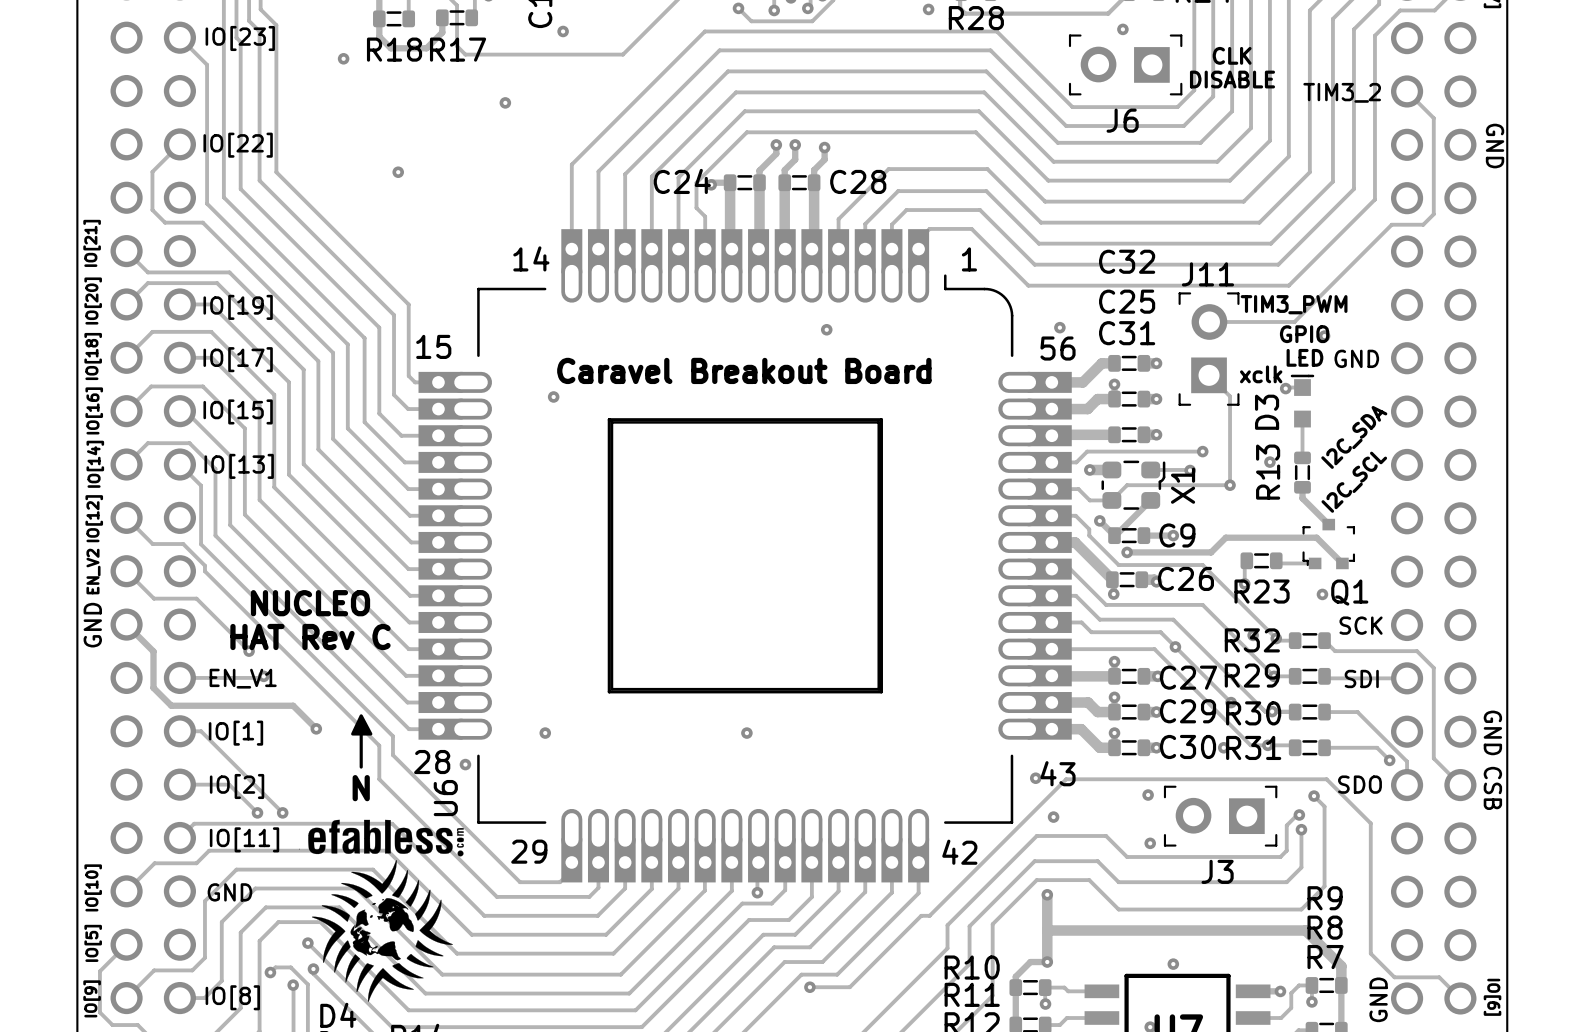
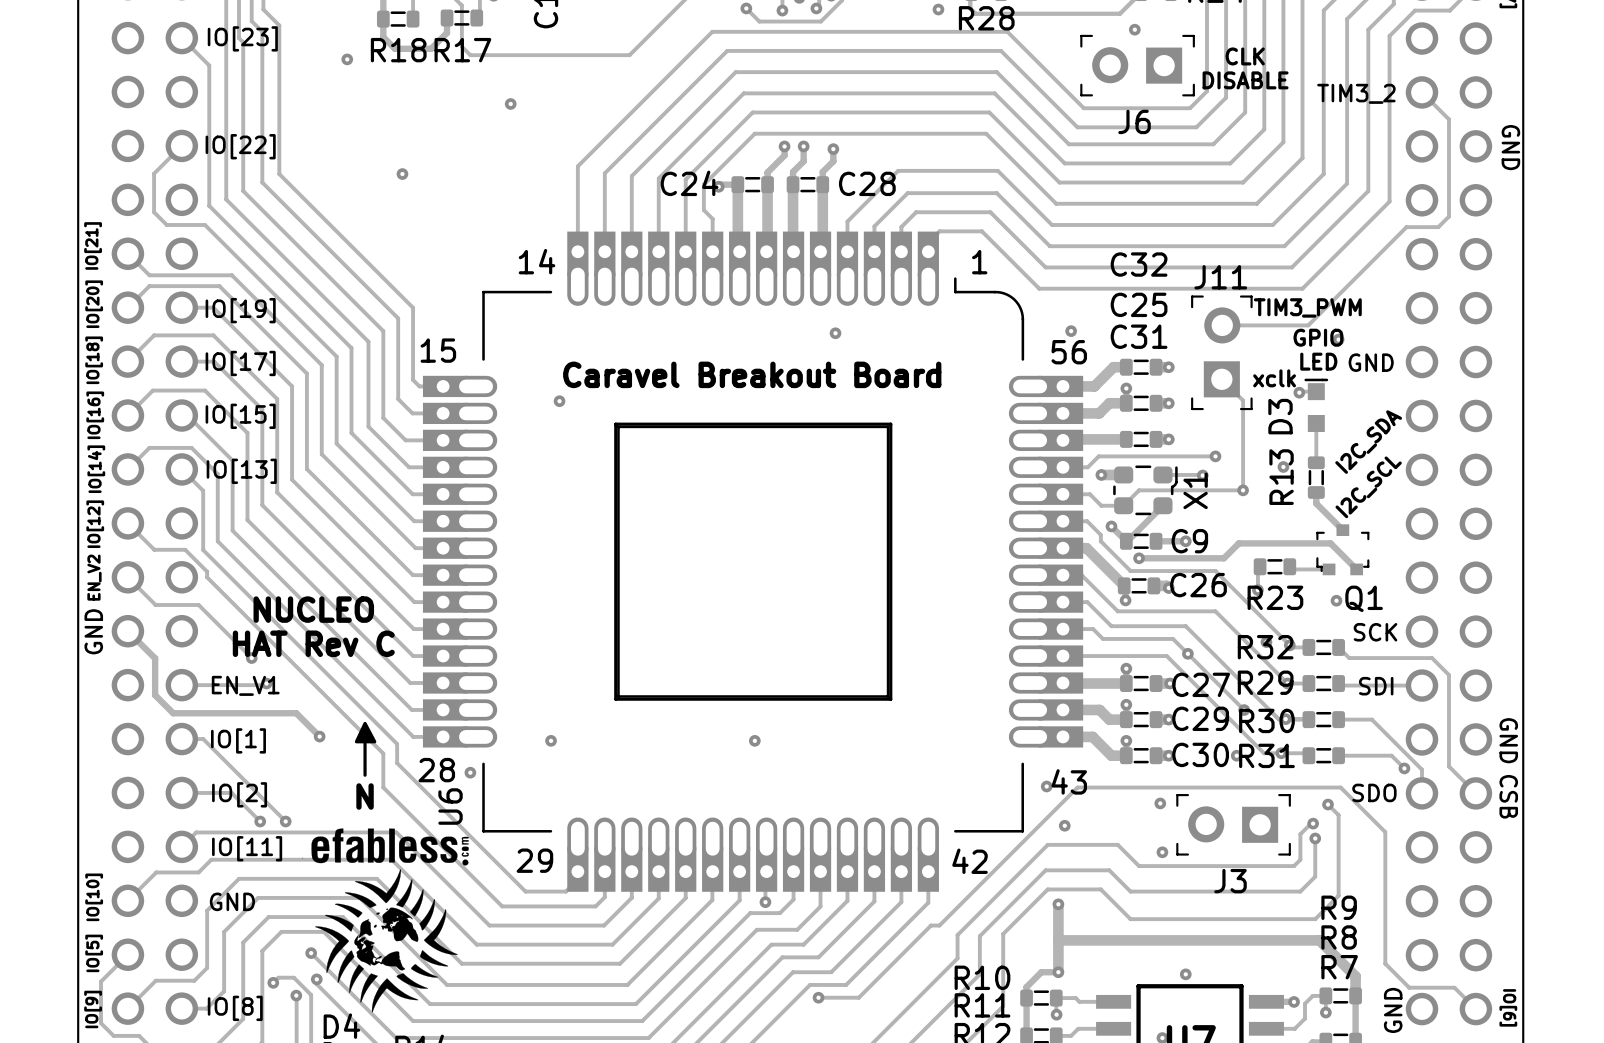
via: (563, 31) -> none

